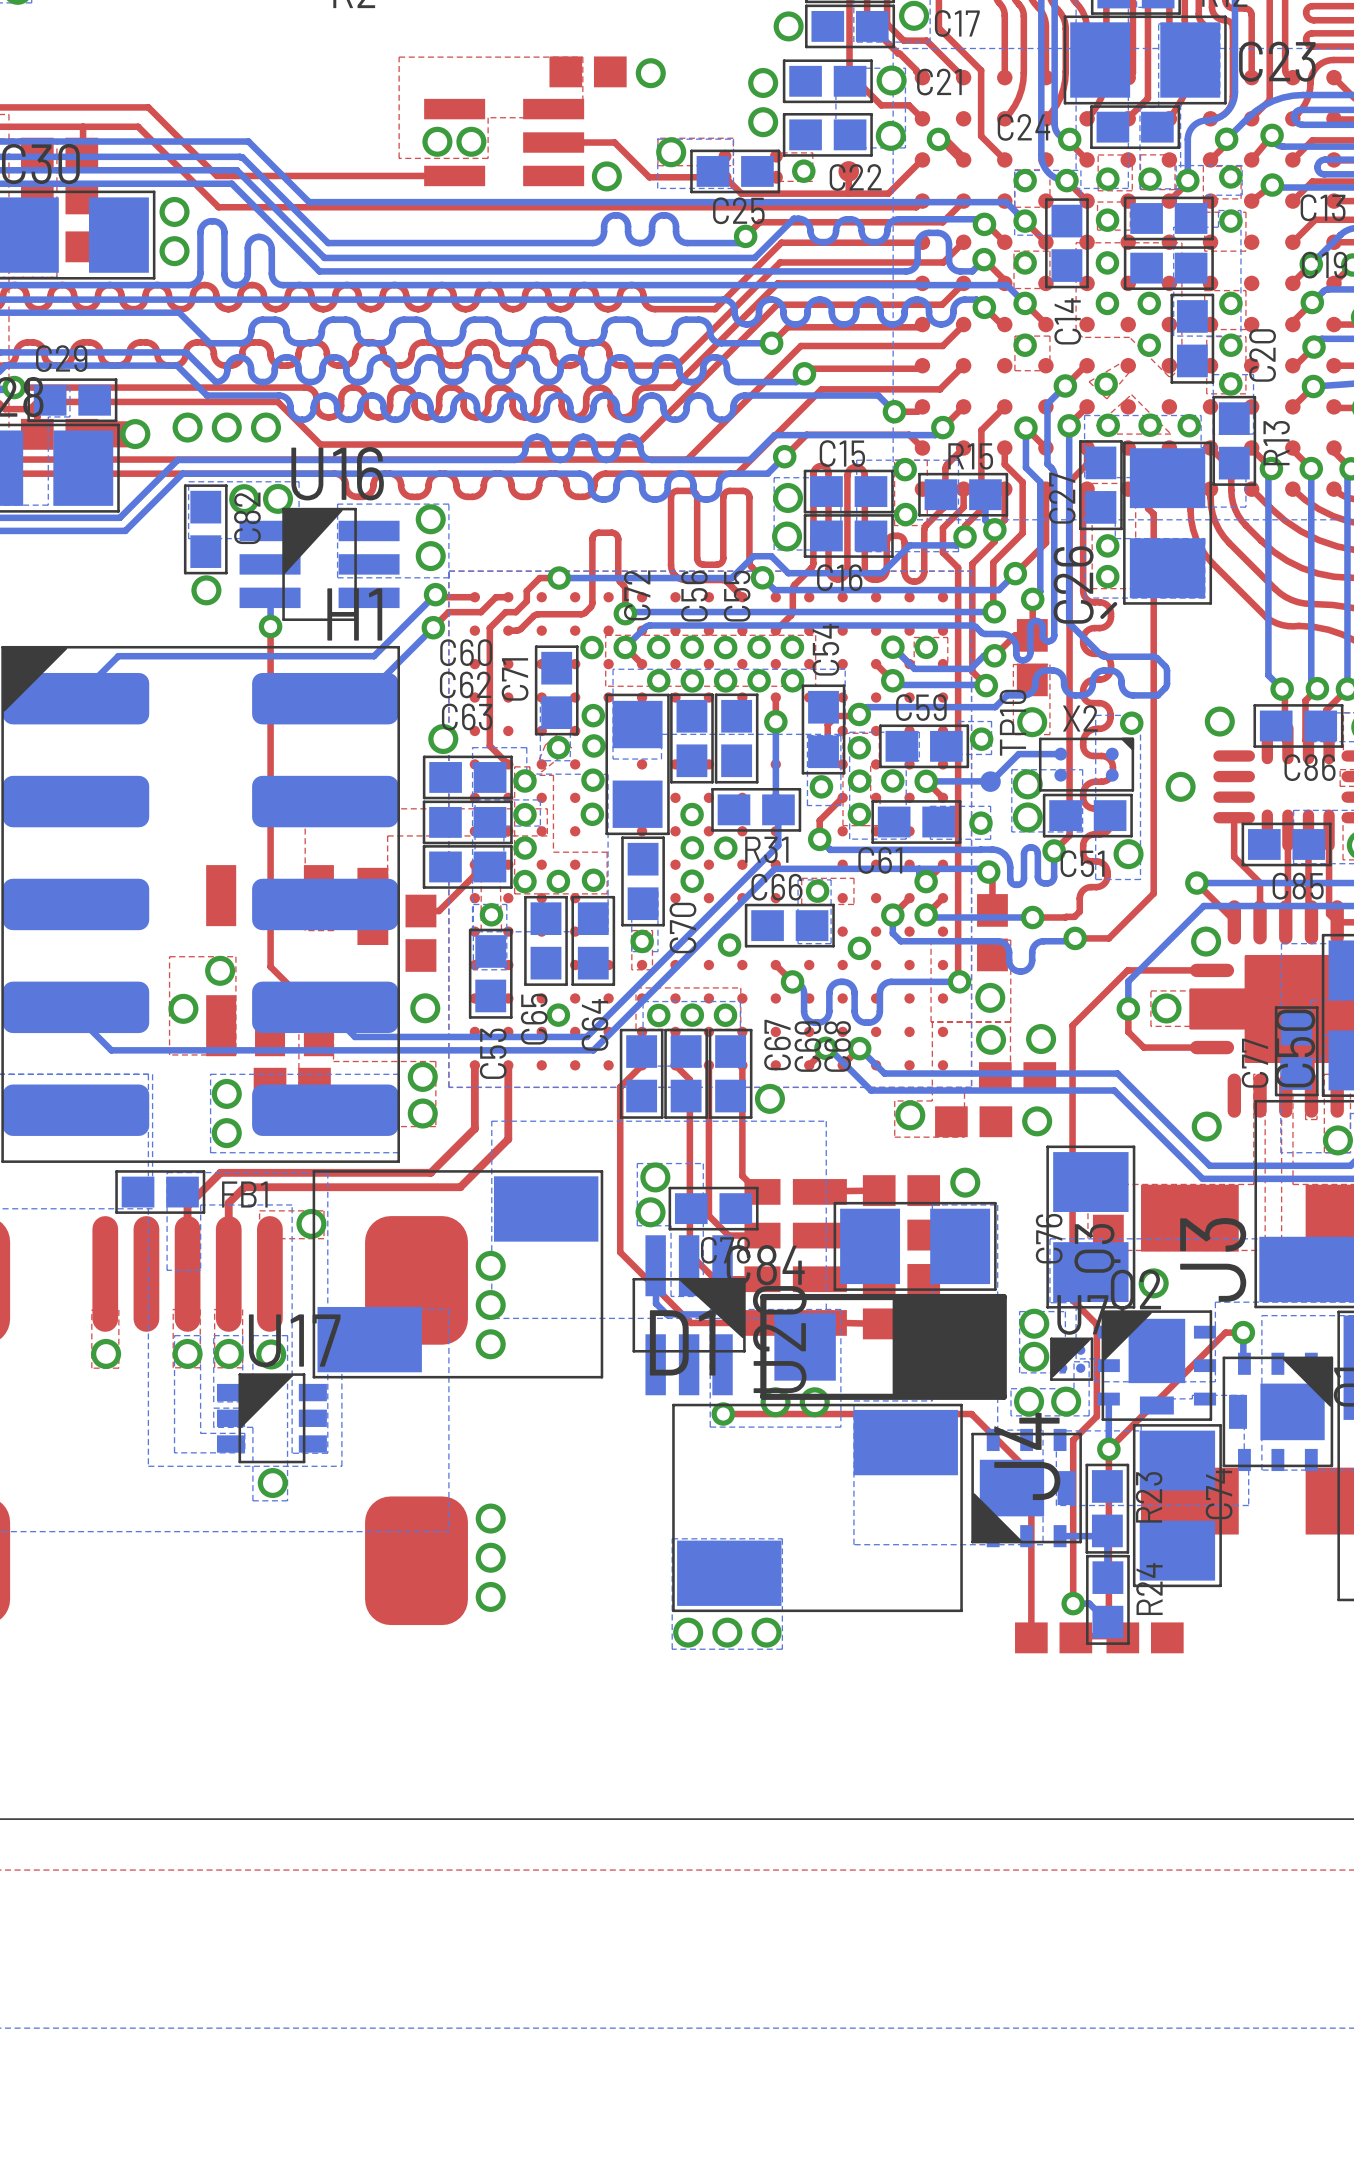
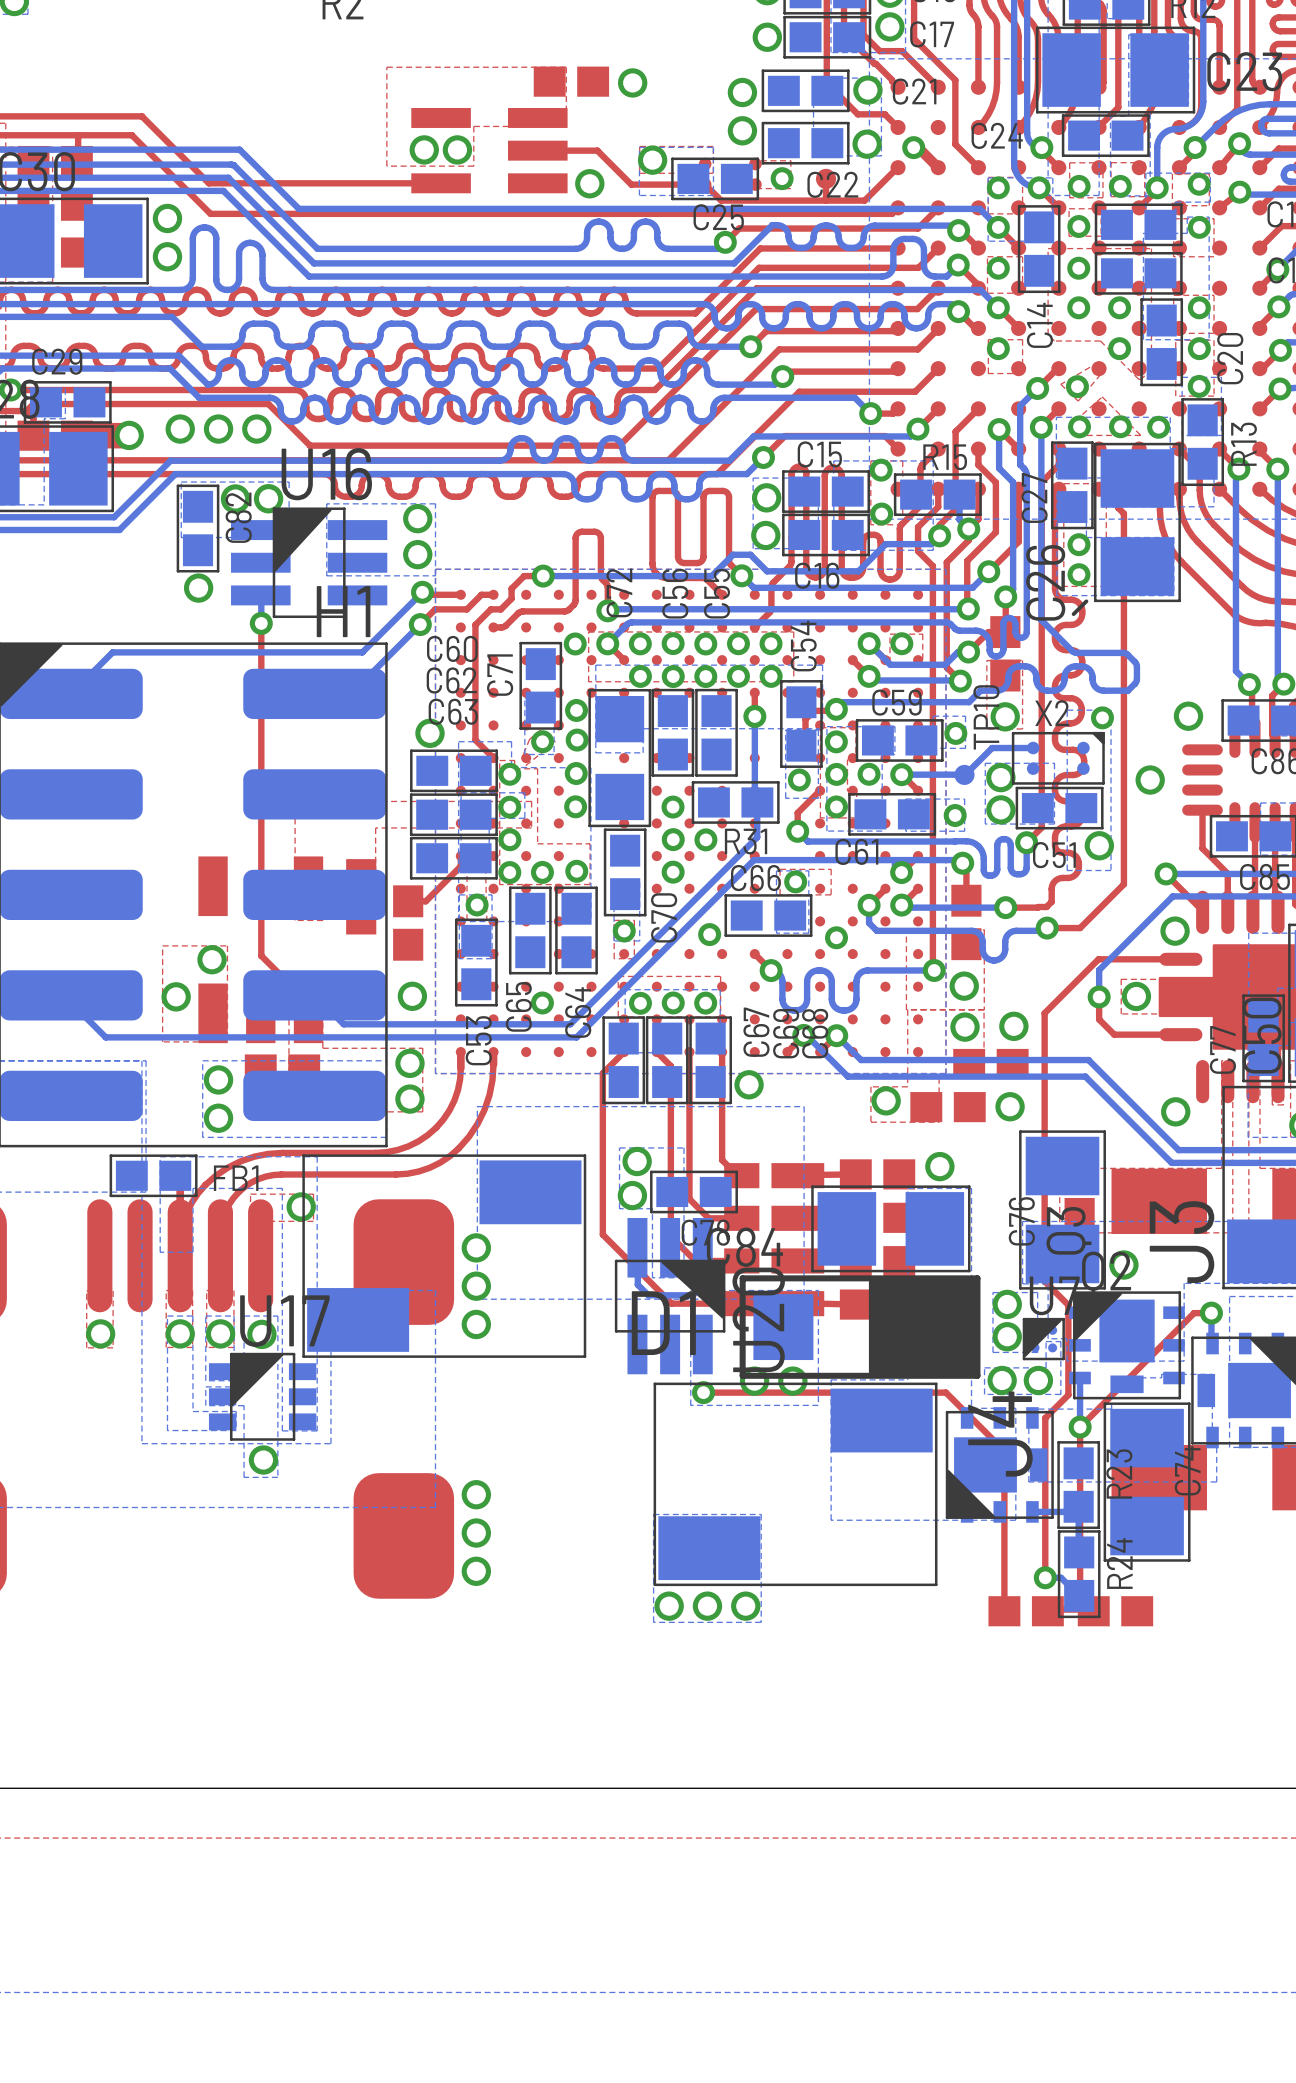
top track: (508, 1078) (508, 1139) (460, 1187) (244, 1187) (228, 1203) (228, 1253) -> (493, 1064) (489, 1095) (477, 1123) (458, 1148) (440, 1162) (418, 1171) (407, 1173) (281, 1174) (265, 1176) (244, 1187) (233, 1198) (225, 1212) (220, 1236)
top track: (474, 1081) (474, 1128) (430, 1172) (220, 1172) (187, 1205) -> (460, 1068) (454, 1100) (443, 1119) (427, 1135) (408, 1146) (375, 1152) (268, 1153) (254, 1156) (228, 1167) (205, 1184) (191, 1202) (183, 1223) (180, 1245)

